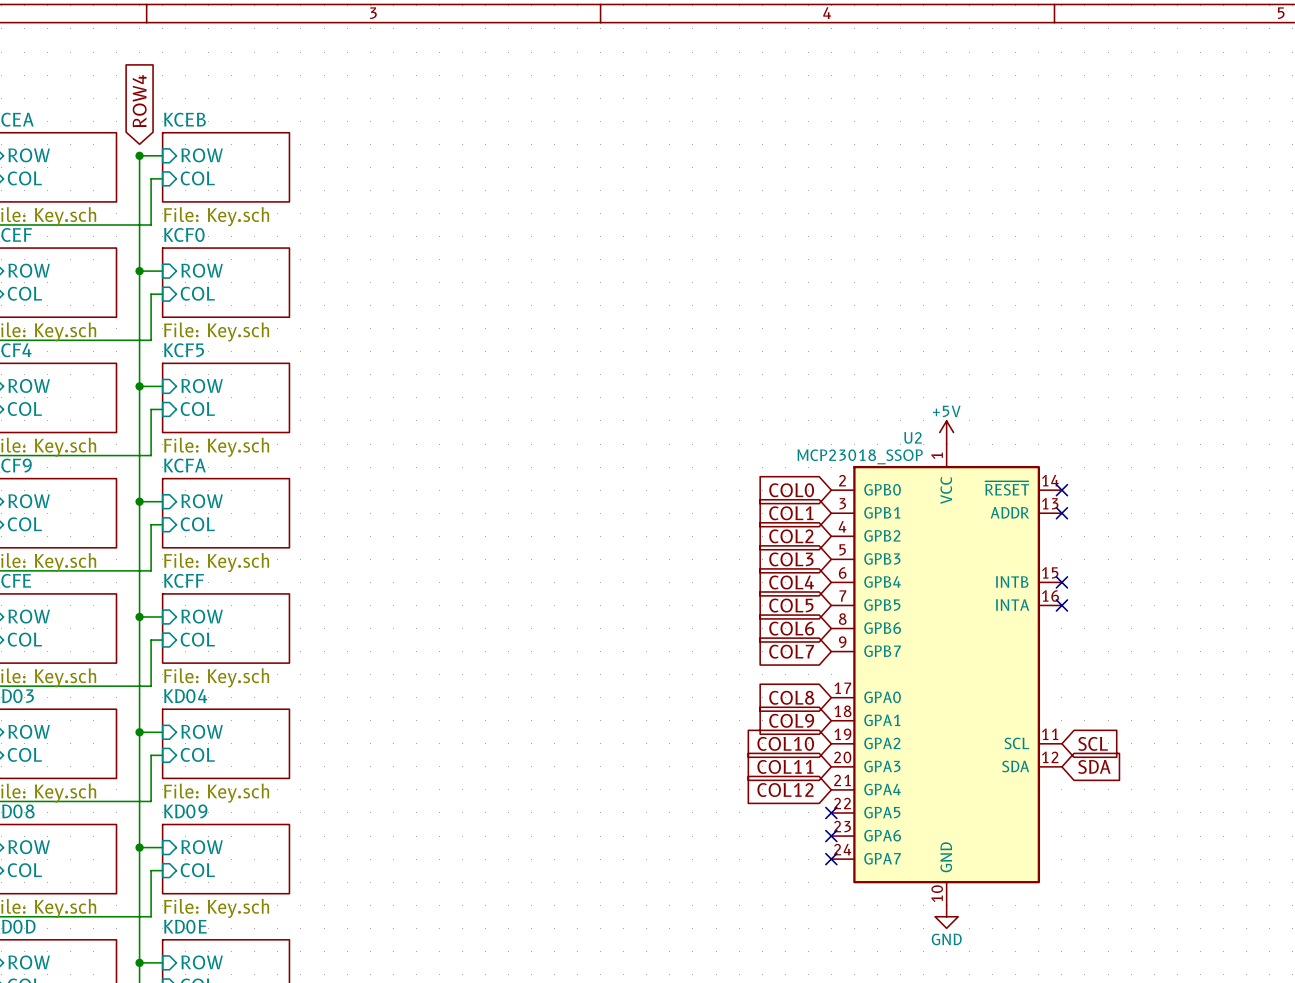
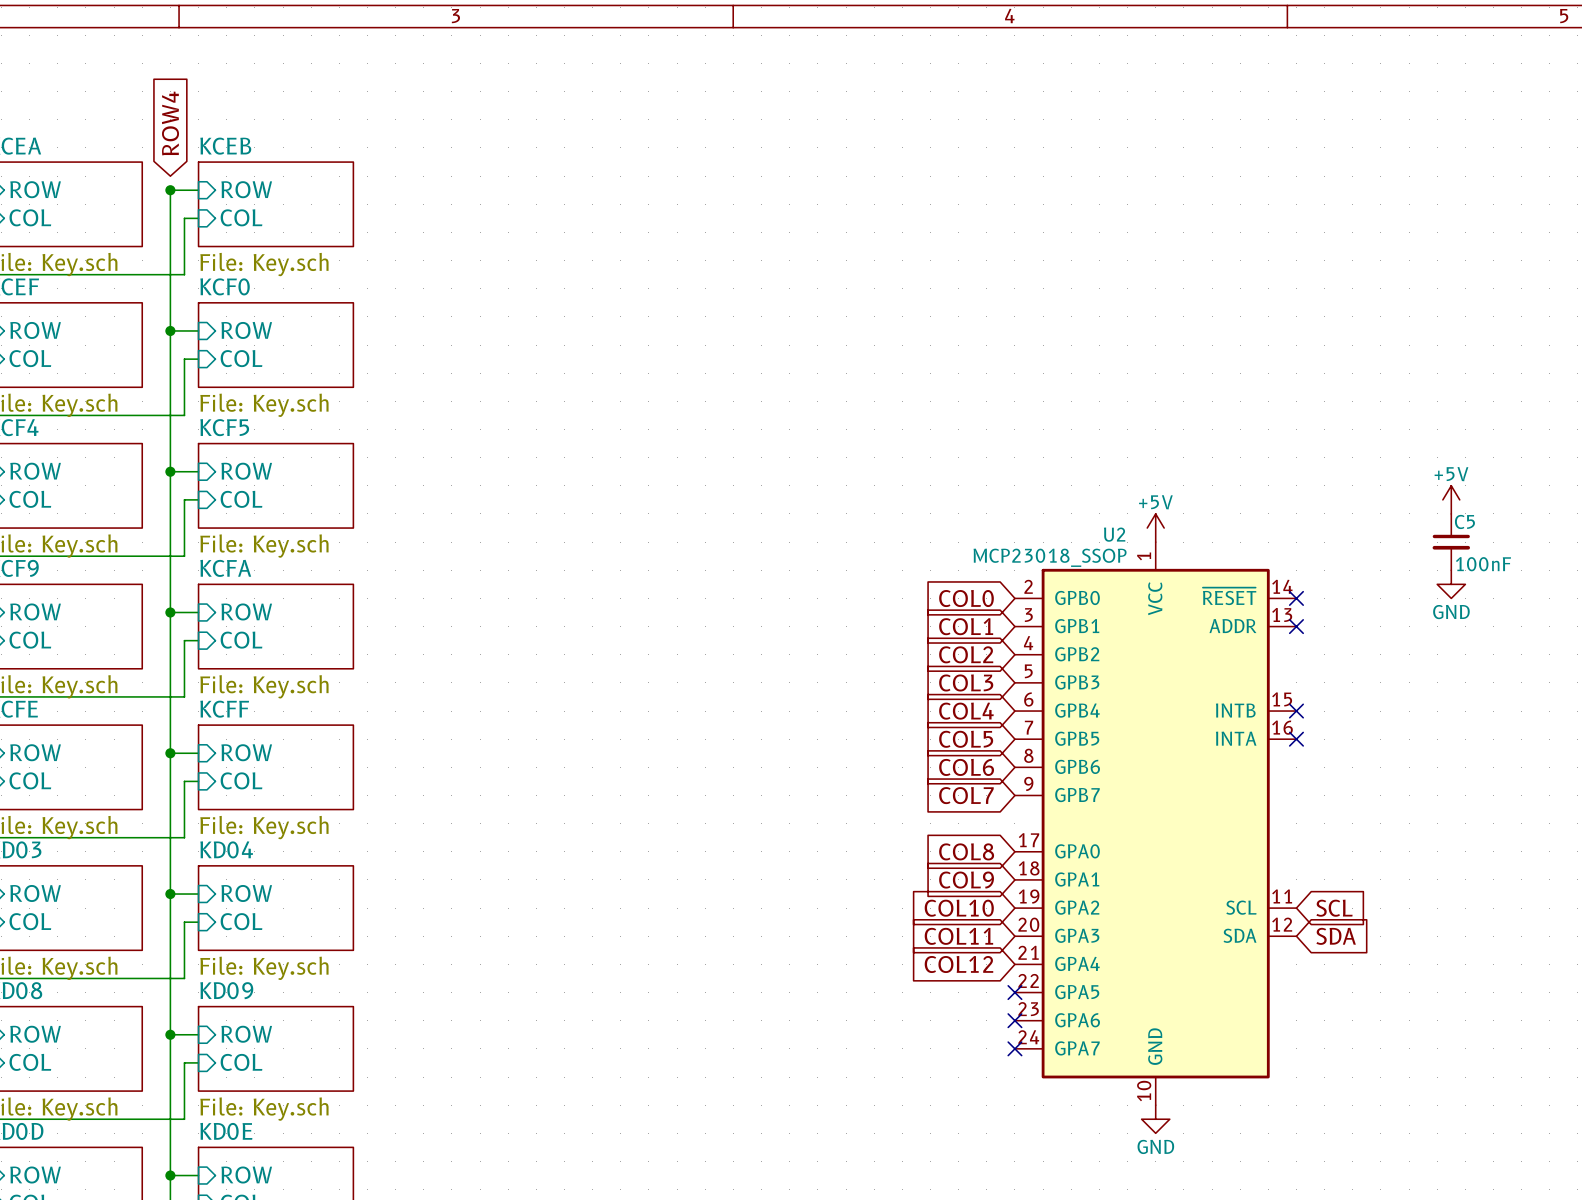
power symbol: none -> +5V (1451, 499)
C5: none -> 100nF (1451, 542)
power symbol: none -> GND (1451, 584)

